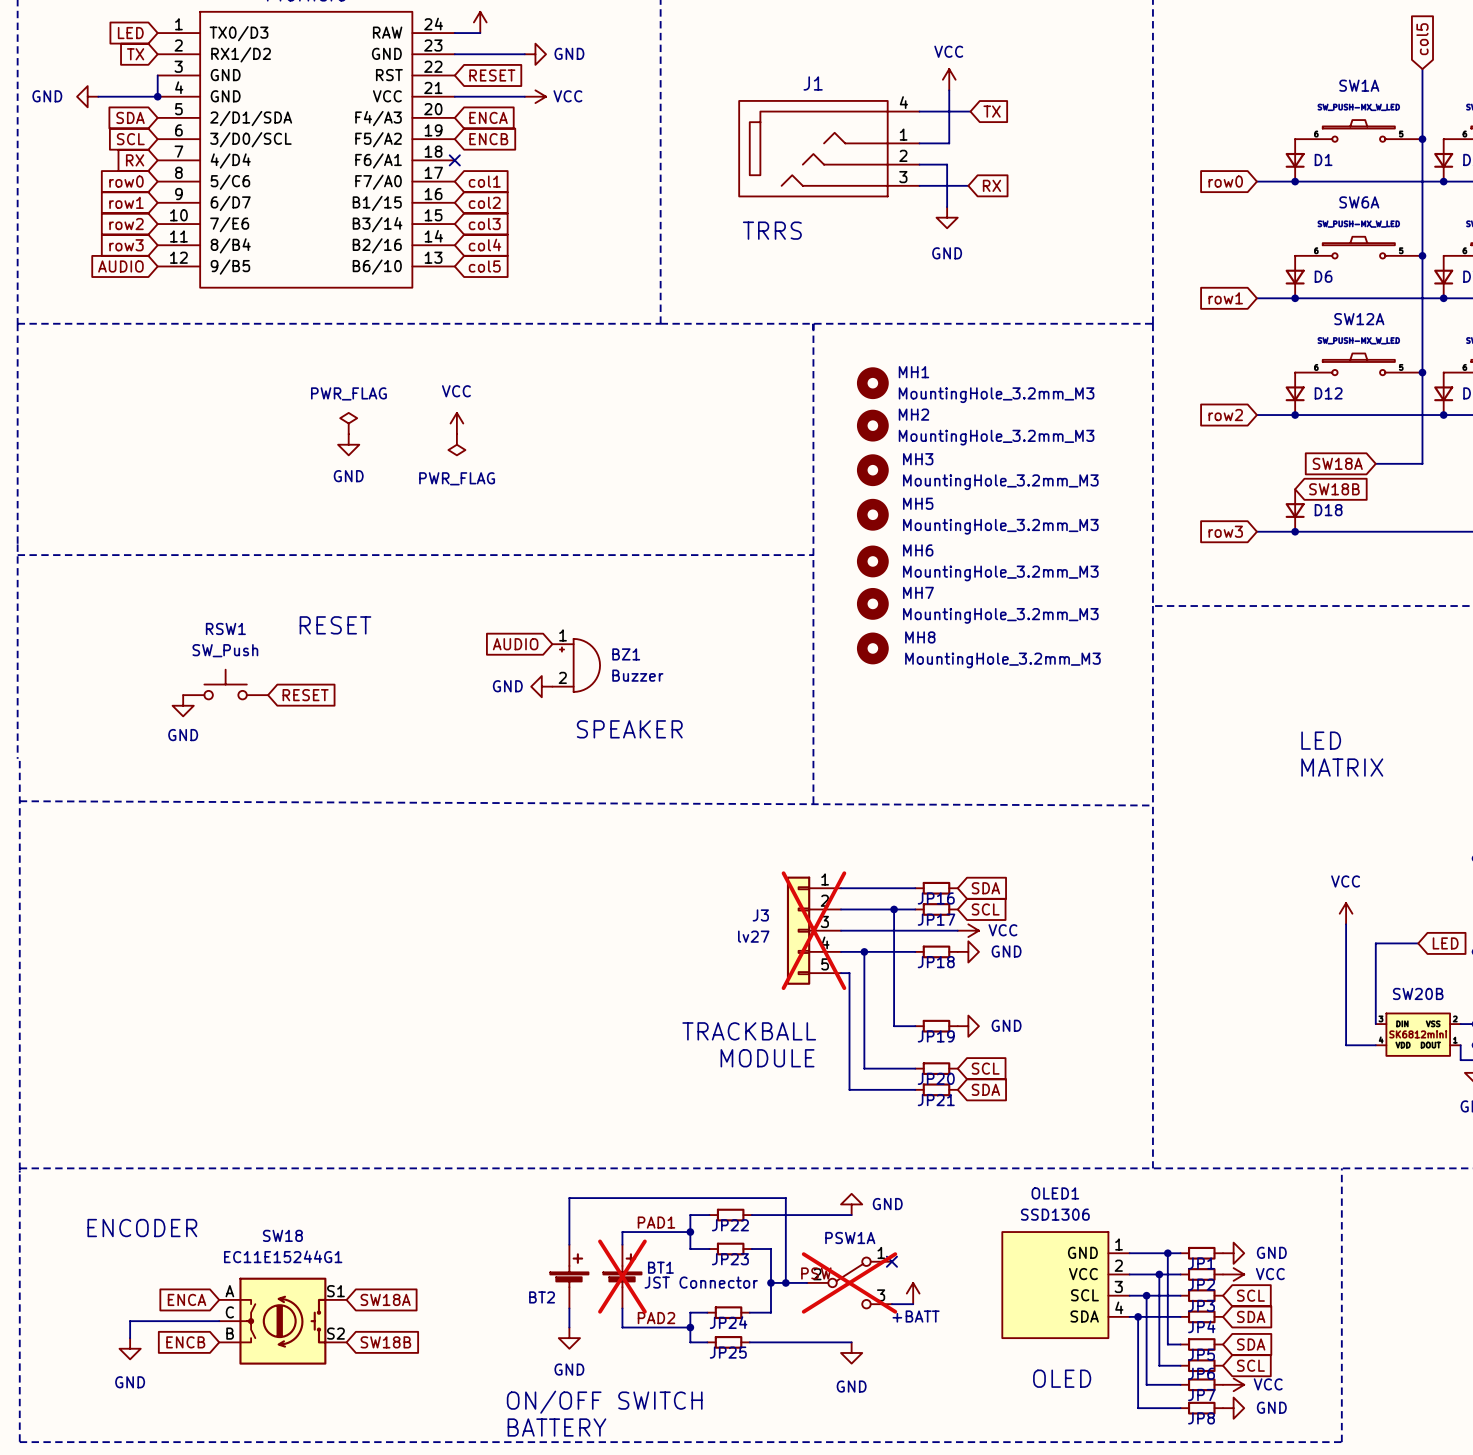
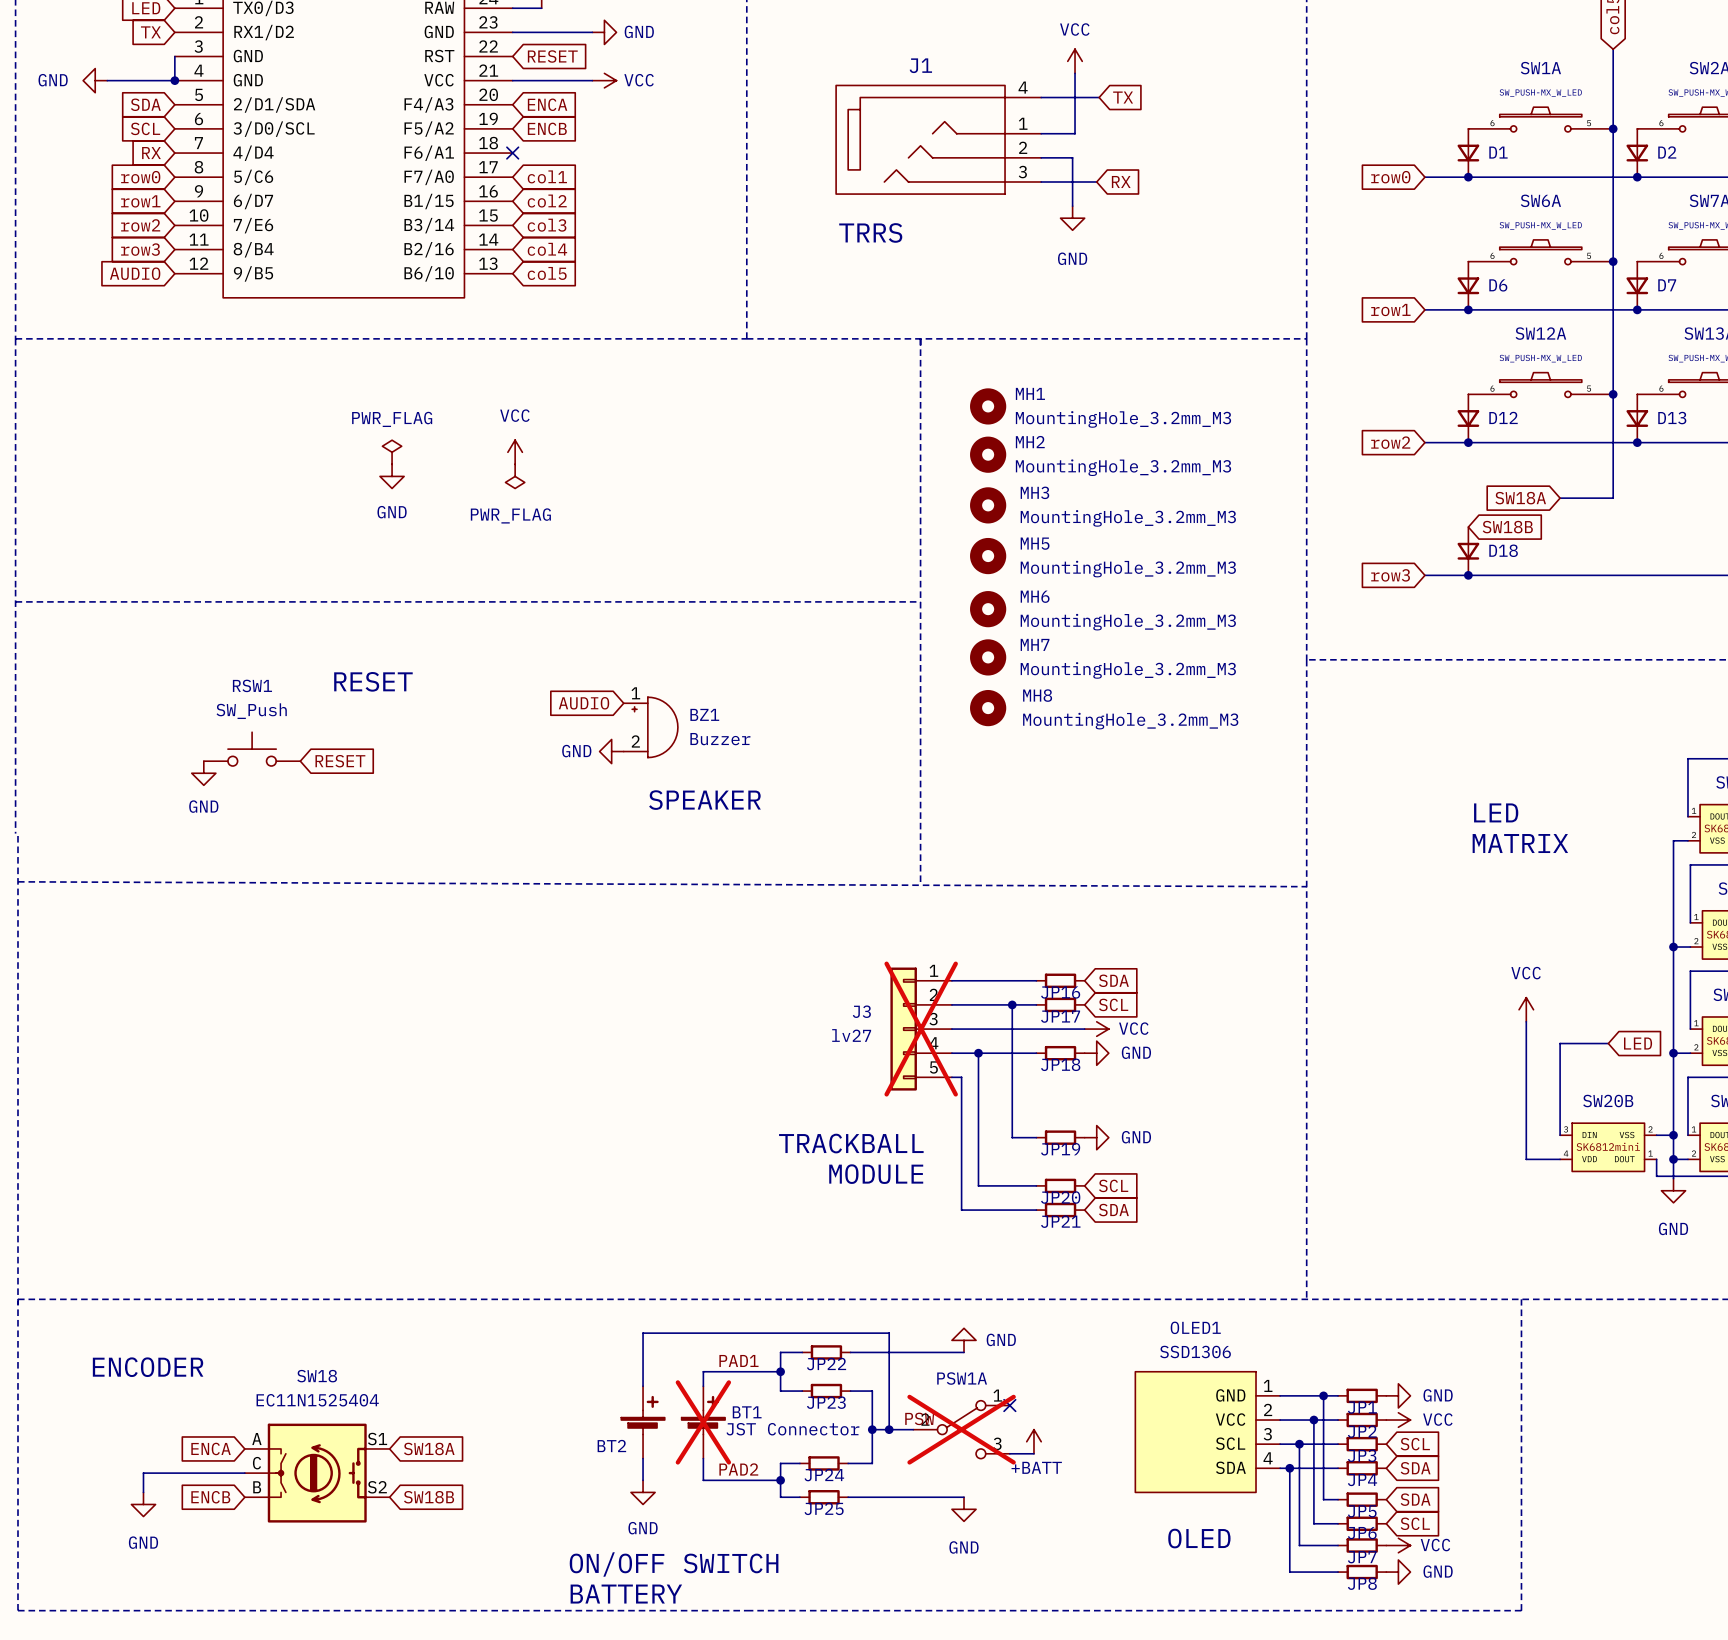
SW18 value: EC11E15244G1 (283, 1256) -> EC11N1525404 (317, 1400)

